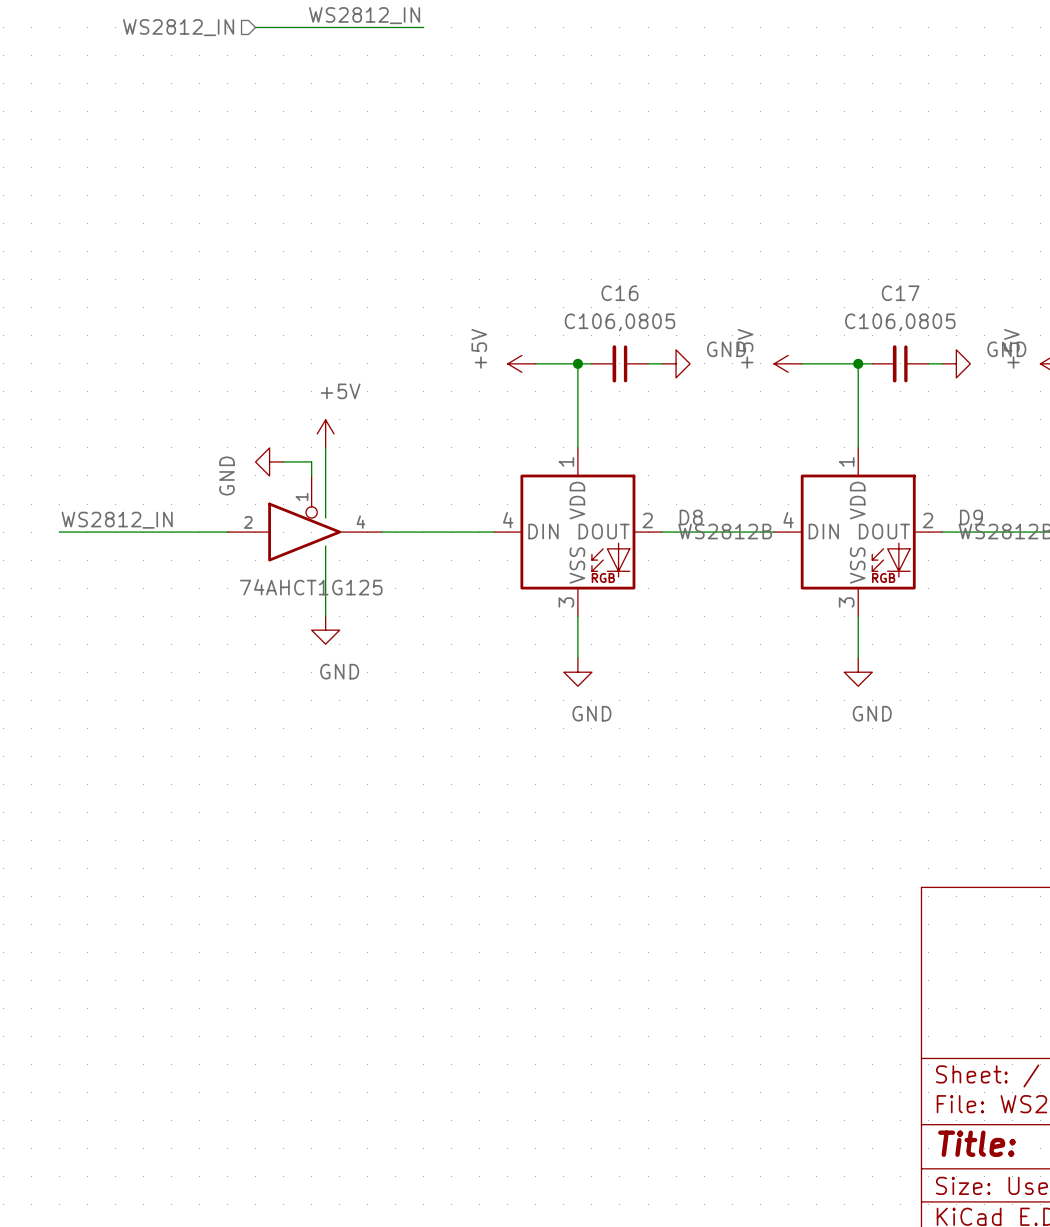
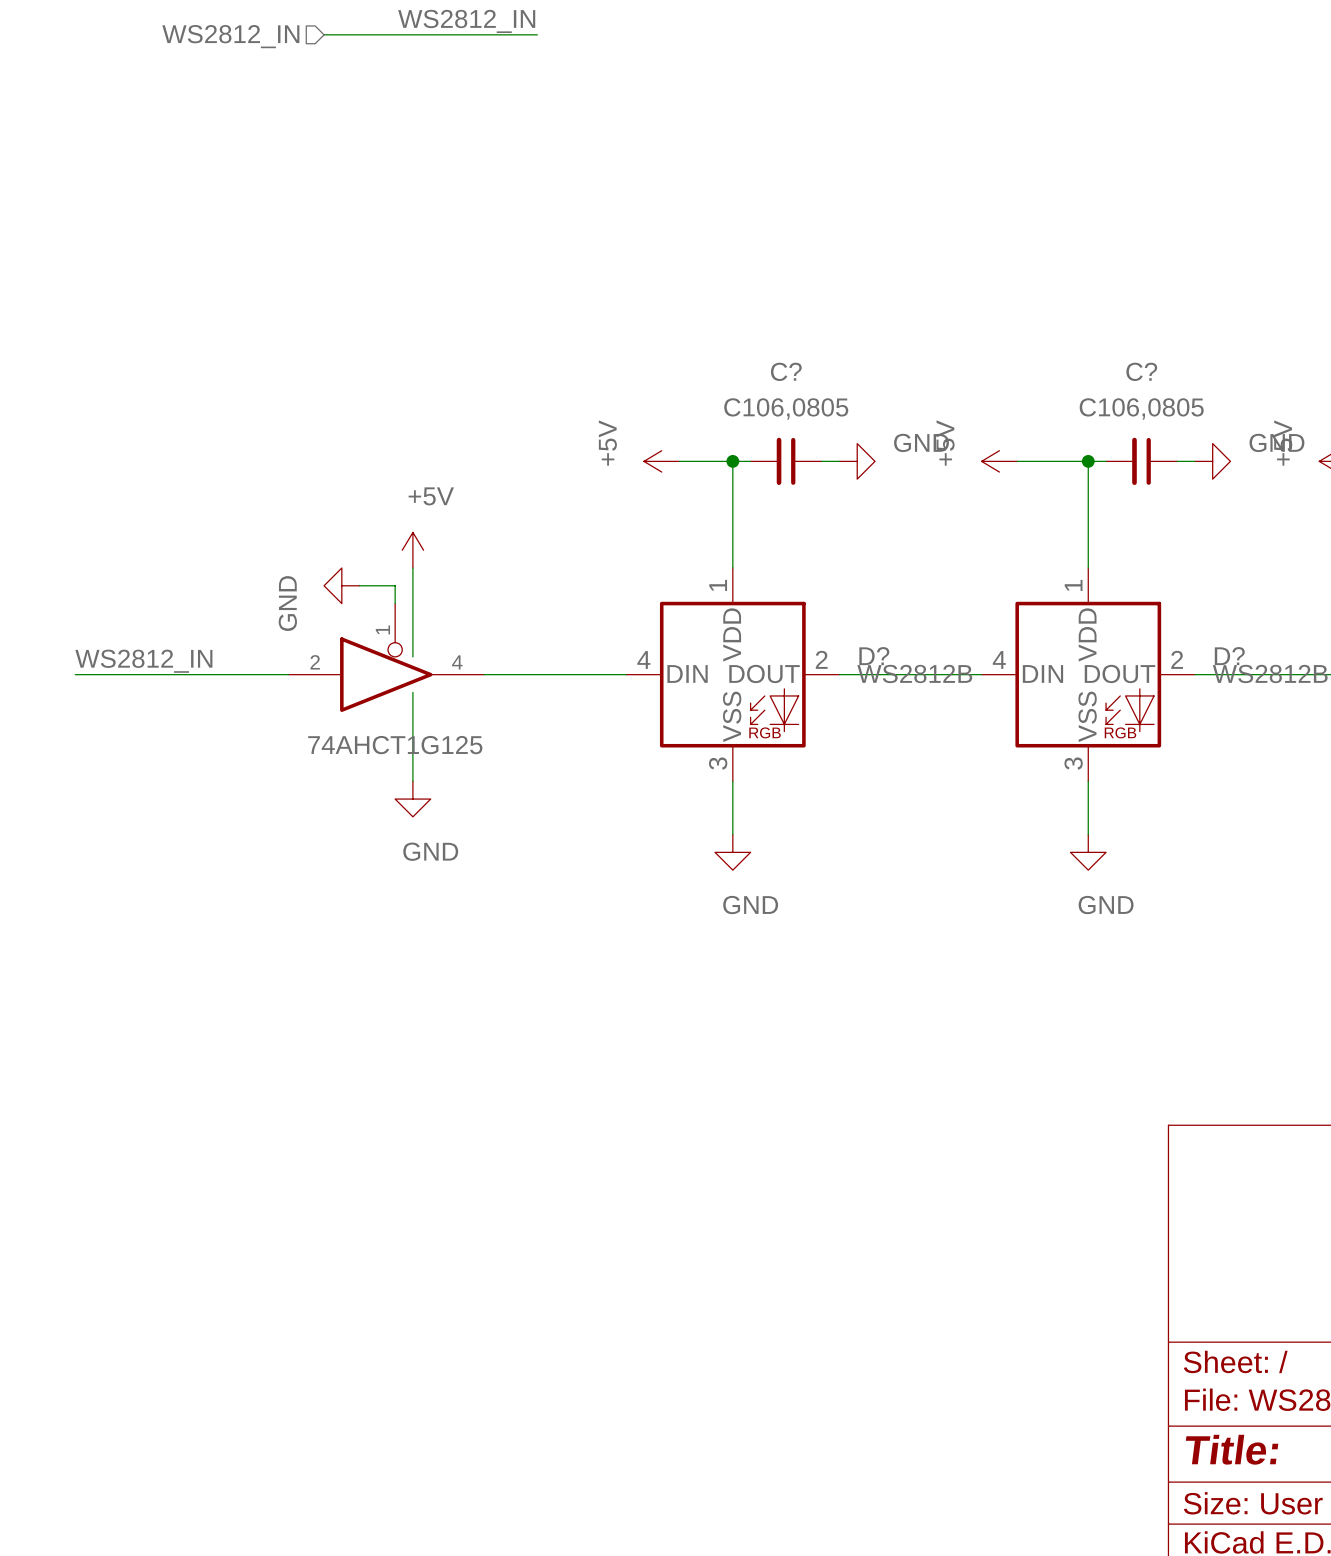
C16 name: C16 (619, 293) -> C? (786, 371)
C17 name: C17 (900, 293) -> C? (1141, 371)
D8 name: D8 (691, 517) -> D? (874, 656)
D9 name: D9 (971, 517) -> D? (1229, 656)

